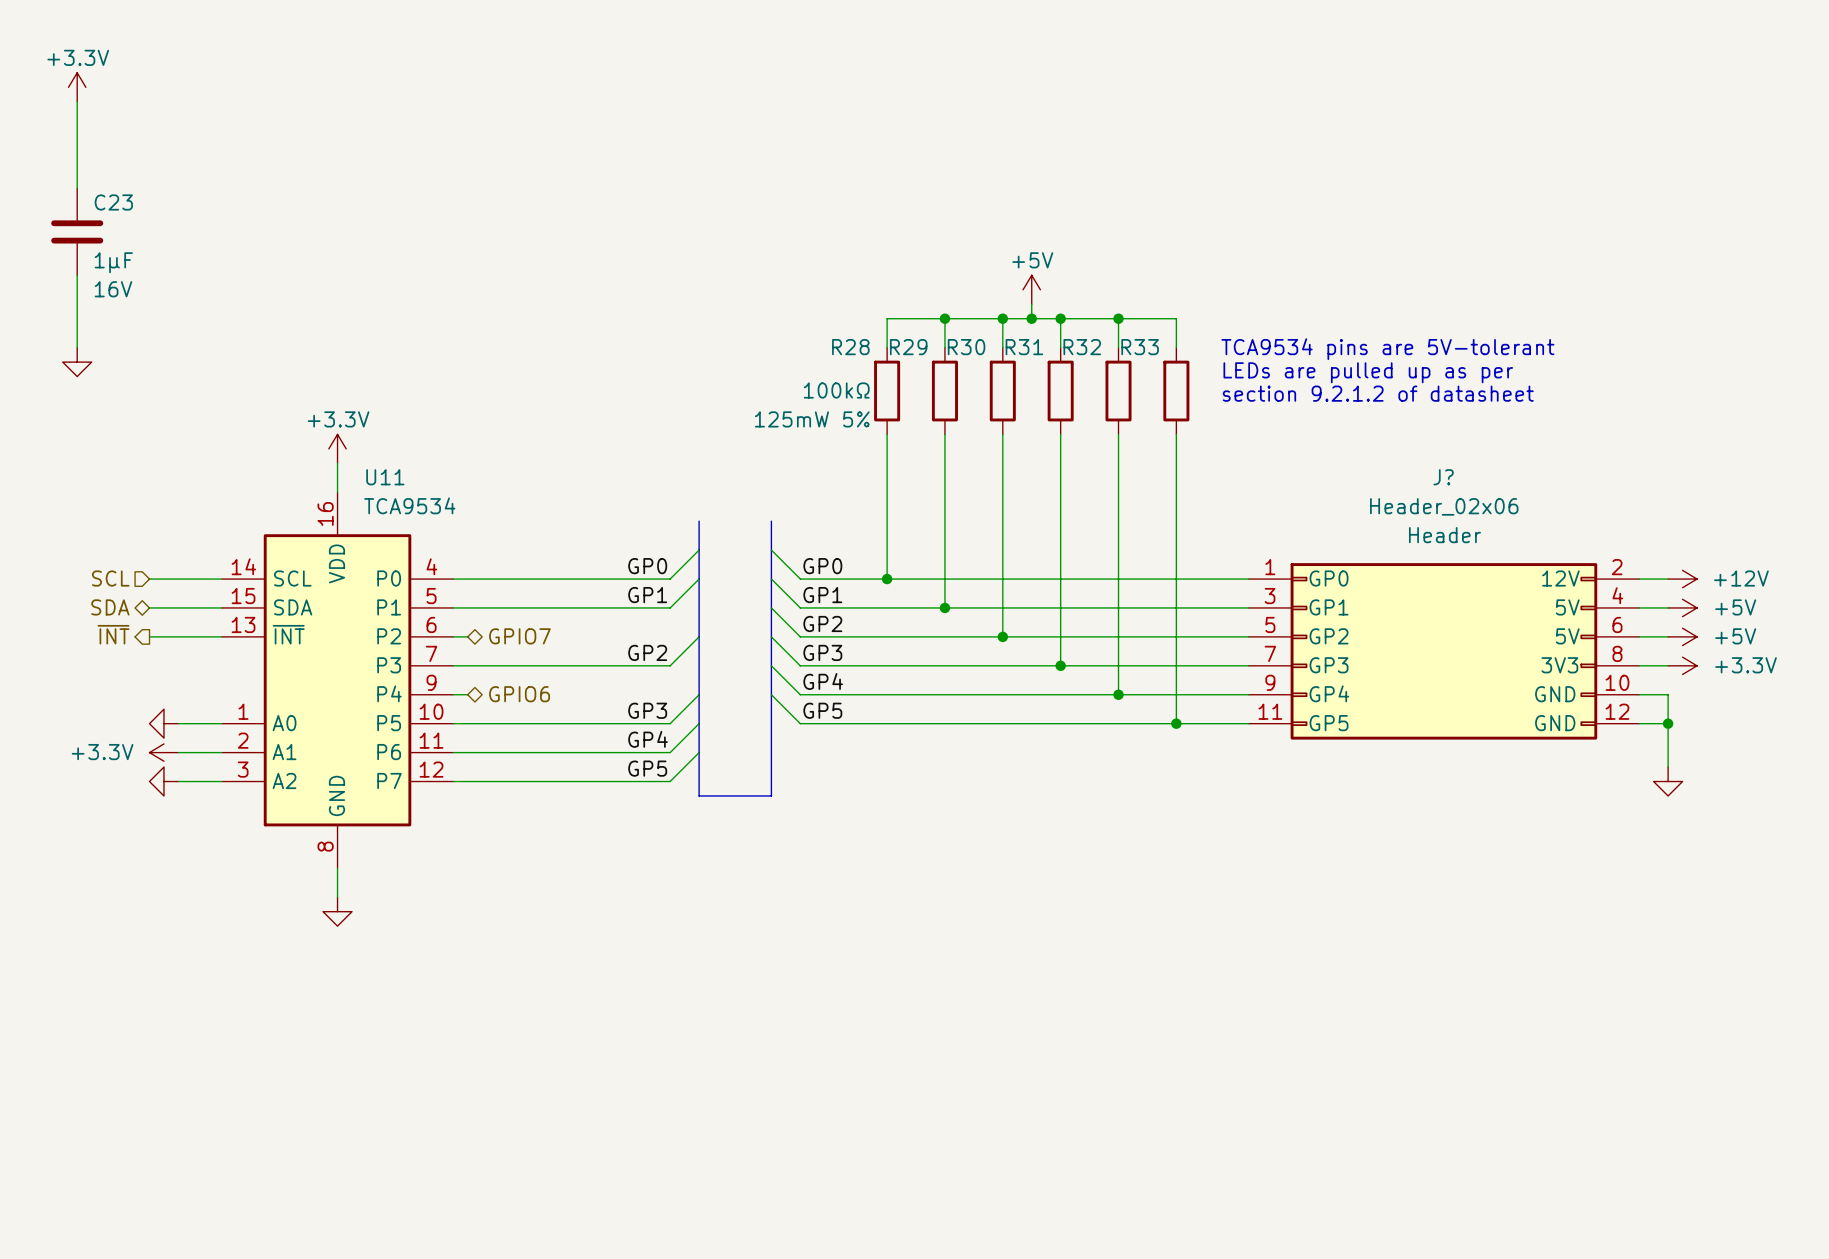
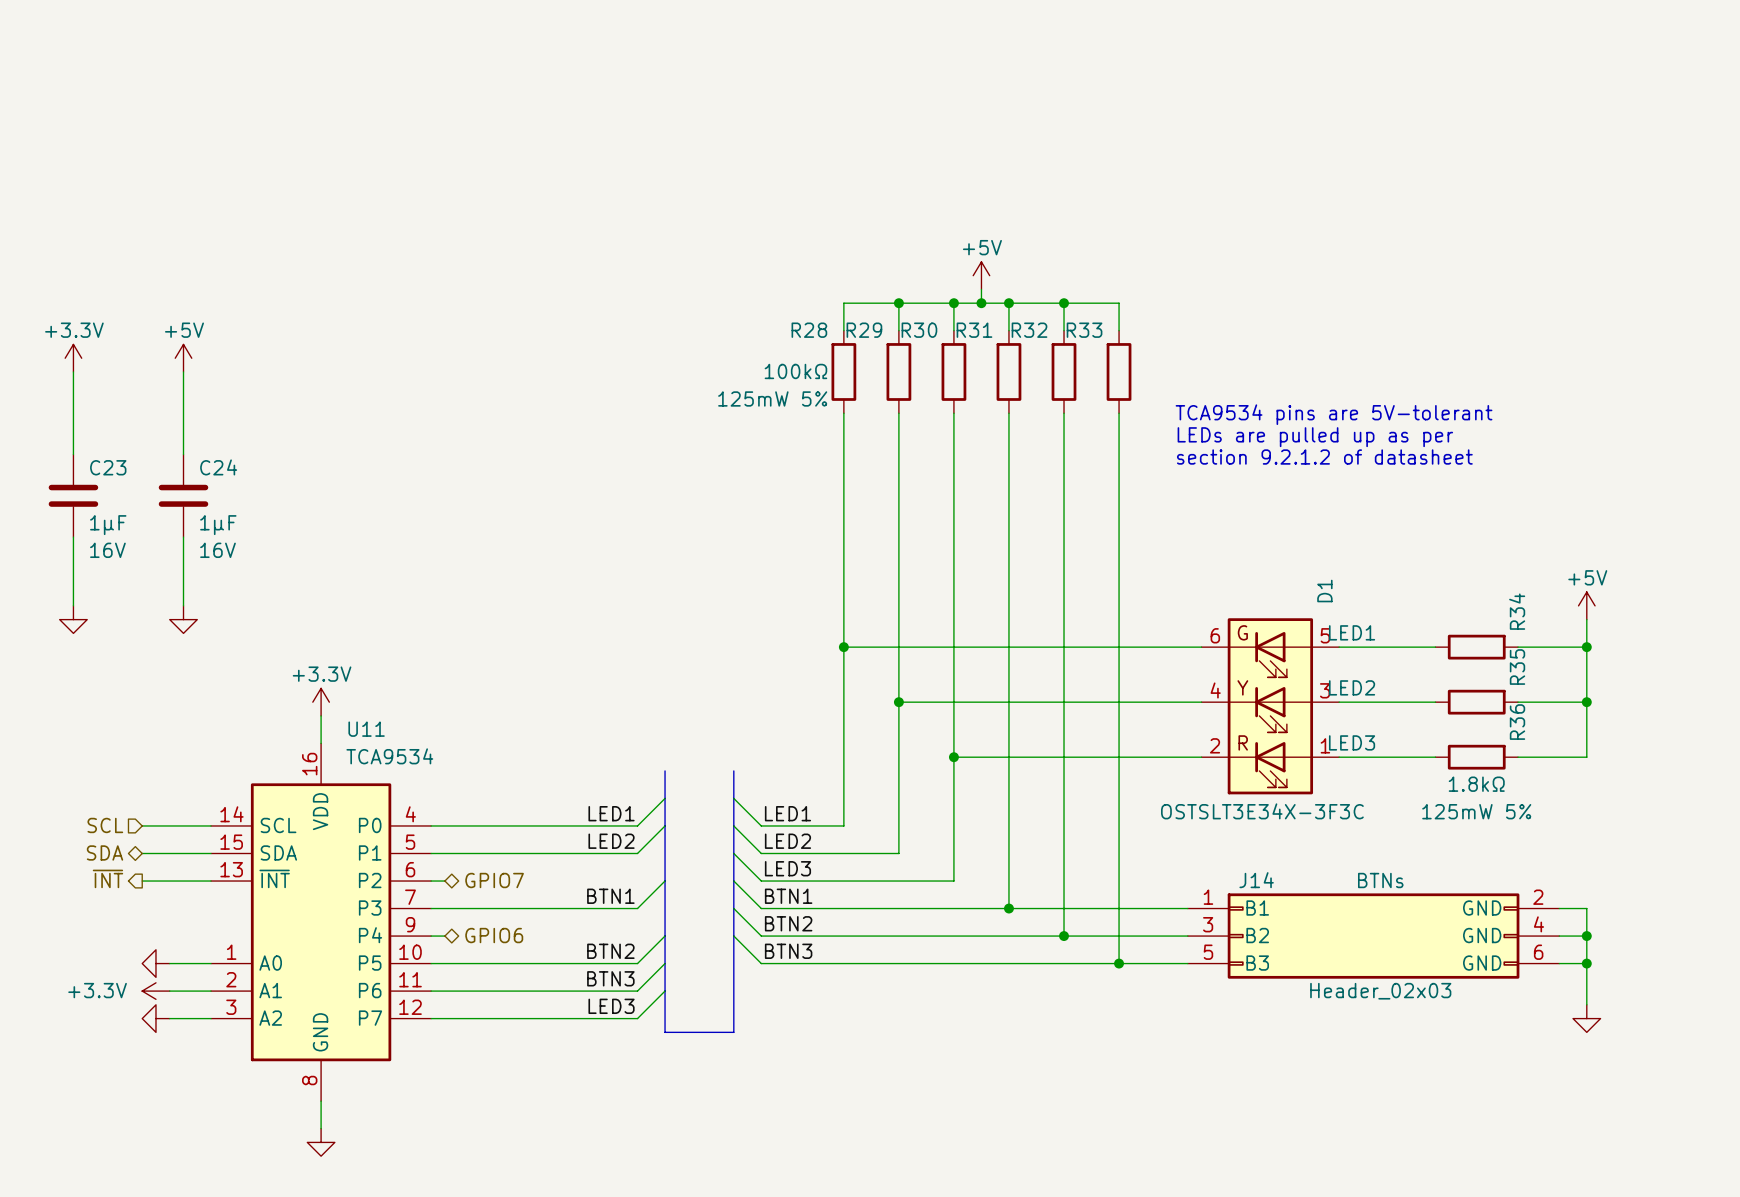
power symbol: +3.3V (77, 87) -> none
wire: (77, 101) (77, 188) -> none
C23 position: (77, 231) -> (73, 495)
wire: (77, 275) (77, 347) -> none
text position: TCA9534 pins are 5V-tolerant (1387, 349) -> TCA9534 pins are 5V-tolerant (1334, 414)
power symbol: (77, 362) -> none
text position: LEDs are pulled up as per (1368, 372) -> LEDs are pulled up as per (1315, 437)
power symbol: none -> +3.3V (73, 358)
power symbol: none -> +5V (183, 358)
wire: none -> (73, 371) (73, 454)
wire: none -> (183, 371) (183, 454)
text position: section 9.2.1.2 of datasheet (1378, 393) -> section 9.2.1.2 of datasheet (1324, 457)
power symbol: +3.3V (337, 448) -> none
wire: (337, 463) (337, 492) -> none
C24: none -> 1μF (183, 495)
bus: (699, 521) (699, 795) (771, 795) (771, 521) -> none
wire: (699, 550) (670, 579) (453, 579) -> none
wire: (771, 550) (800, 579) (1248, 579) -> none
wire: none -> (73, 537) (73, 605)
wire: none -> (183, 537) (183, 605)
label: GP0 (647, 566) -> none
label: GP0 (822, 566) -> none
hierarchical label: SCL (110, 578) -> none
wire: (149, 579) (221, 579) -> none
wire: (699, 579) (670, 607) (453, 607) -> (665, 798) (637, 825) (431, 825)
wire: (771, 579) (800, 607) (1248, 607) -> none
wire: none -> (843, 550) (843, 825) (761, 825) (733, 798)
junction: (887, 579) -> none
wire: (1639, 579) (1668, 579) -> none
power symbol: +12V (1682, 579) -> none
label: GP1 (647, 595) -> none
label: GP1 (822, 595) -> none
hierarchical label: SDA (110, 607) -> none
wire: (149, 607) (221, 607) -> (142, 825) (211, 825)
wire: (771, 607) (800, 636) (1248, 636) -> none
wire: none -> (898, 578) (898, 853) (761, 853) (733, 825)
junction: (944, 607) -> none
wire: (1639, 607) (1668, 607) -> none
power symbol: +5V (1682, 607) -> none
label: GP2 (822, 623) -> none
hierarchical label: ~{INT} (113, 634) -> none
wire: (149, 636) (221, 636) -> (142, 853) (211, 853)
wire: (453, 636) (467, 636) -> none
hierarchical label: GPIO7 (519, 636) -> none
wire: (699, 636) (670, 665) (453, 665) -> (665, 825) (637, 853) (431, 853)
wire: (771, 636) (800, 665) (1248, 665) -> none
wire: none -> (953, 605) (953, 881) (761, 881) (733, 853)
junction: (1002, 636) -> none
wire: (1639, 636) (1668, 636) -> none
power symbol rotation: 0° (1682, 636) -> 90° counterclockwise (1586, 605)
power symbol text position: +5V (1735, 636) -> +5V (1587, 577)
power symbol: none -> (73, 619)
power symbol: none -> (183, 619)
J?: Header_02x06 (1443, 651) -> none
label: GP2 (647, 652) -> none
label: GP3 (822, 652) -> none
wire: (771, 665) (800, 694) (1248, 694) -> (733, 881) (761, 908) (1187, 908)
wire: none -> (1008, 633) (1008, 908)
junction: (1060, 665) -> none
wire: (1639, 665) (1668, 665) -> none
power symbol: +3.3V (1682, 665) -> none
U11 position: (337, 680) -> (321, 922)
wire: none -> (843, 647) (1201, 647)
junction: none -> (843, 647)
R34: none -> 1.8kΩ (1476, 647)
wire: none -> (1518, 647) (1586, 647)
junction: none -> (1586, 647)
label: GP4 (823, 681) -> none
wire: (453, 694) (467, 694) -> (431, 881) (444, 881)
hierarchical label: GPIO6 (519, 694) -> none
wire: (699, 694) (670, 723) (453, 723) -> (665, 881) (637, 908) (431, 908)
wire: (771, 694) (800, 723) (1248, 723) -> (733, 908) (761, 936) (1187, 936)
wire: none -> (1064, 660) (1064, 936)
junction: (1118, 694) -> none
wire: (1639, 694) (1668, 694) -> (1586, 619) (1586, 660)
label: GP3 (647, 710) -> none
label: GP5 (822, 710) -> none
power symbol: (163, 723) -> none
wire: (178, 723) (221, 723) -> none
wire: (699, 723) (670, 752) (453, 752) -> (665, 936) (637, 963) (431, 963)
wire: none -> (1119, 688) (1119, 963)
junction: (1176, 723) -> none
wire: (1639, 723) (1668, 723) -> (1559, 936) (1586, 936)
junction position: (1668, 723) -> (1586, 702)
power symbol: none -> +3.3V (321, 702)
wire: none -> (898, 702) (1201, 702)
junction: none -> (898, 702)
R35: none -> (1476, 702)
wire: none -> (1518, 702) (1586, 702)
label: GP4 (648, 739) -> none
D1: none -> OSTSLT3E34X-3F3C (1270, 706)
power symbol: +3.3V (163, 752) -> none
wire: (178, 752) (221, 752) -> (169, 963) (211, 963)
wire: (699, 752) (670, 781) (453, 781) -> (665, 963) (637, 991) (431, 991)
wire: none -> (1586, 729) (1586, 757) (1518, 757)
label: GP5 (647, 768) -> none
power symbol: (163, 781) -> none
wire: (178, 781) (221, 781) -> (169, 991) (211, 991)
power symbol: (1668, 781) -> none
wire: none -> (953, 757) (1201, 757)
junction: none -> (953, 757)
wire: none -> (1339, 757) (1435, 757)
R36: none -> (1476, 757)
bus: none -> (665, 770) (665, 1032) (733, 1032) (733, 770)
label: none -> LED1 (611, 813)
label: none -> LED1 (787, 813)
hierarchical label: none -> SCL (105, 825)
label: none -> LED2 (611, 841)
label: none -> LED2 (787, 841)
hierarchical label: none -> SDA (105, 852)
power symbol: (337, 911) -> none
label: none -> LED3 (787, 868)
hierarchical label: none -> ~{INT} (107, 878)
hierarchical label: none -> GPIO7 (494, 880)
wire: none -> (142, 881) (211, 881)
label: none -> BTN1 (610, 896)
label: none -> BTN1 (788, 896)
junction: none -> (1008, 908)
wire: none -> (1559, 908) (1586, 908) (1586, 1004)
label: none -> BTN2 (788, 923)
hierarchical label: none -> GPIO6 (494, 935)
wire: none -> (431, 936) (444, 936)
wire: none -> (733, 936) (761, 963) (1187, 963)
junction: none -> (1064, 936)
J14: none -> Header_02x03 (1373, 936)
junction: none -> (1586, 936)
label: none -> BTN2 (610, 951)
label: none -> BTN3 (788, 951)
power symbol: none -> (155, 963)
junction: none -> (1119, 963)
wire: none -> (1559, 963) (1586, 963)
junction: none -> (1586, 963)
label: none -> BTN3 (610, 978)
power symbol: none -> +3.3V (155, 991)
wire: none -> (665, 991) (637, 1018) (431, 1018)
label: none -> LED3 (611, 1006)
power symbol: none -> (155, 1018)
wire: none -> (169, 1018) (211, 1018)
power symbol: none -> (1586, 1018)
wire: none -> (321, 1101) (321, 1128)
power symbol: none -> (321, 1142)

